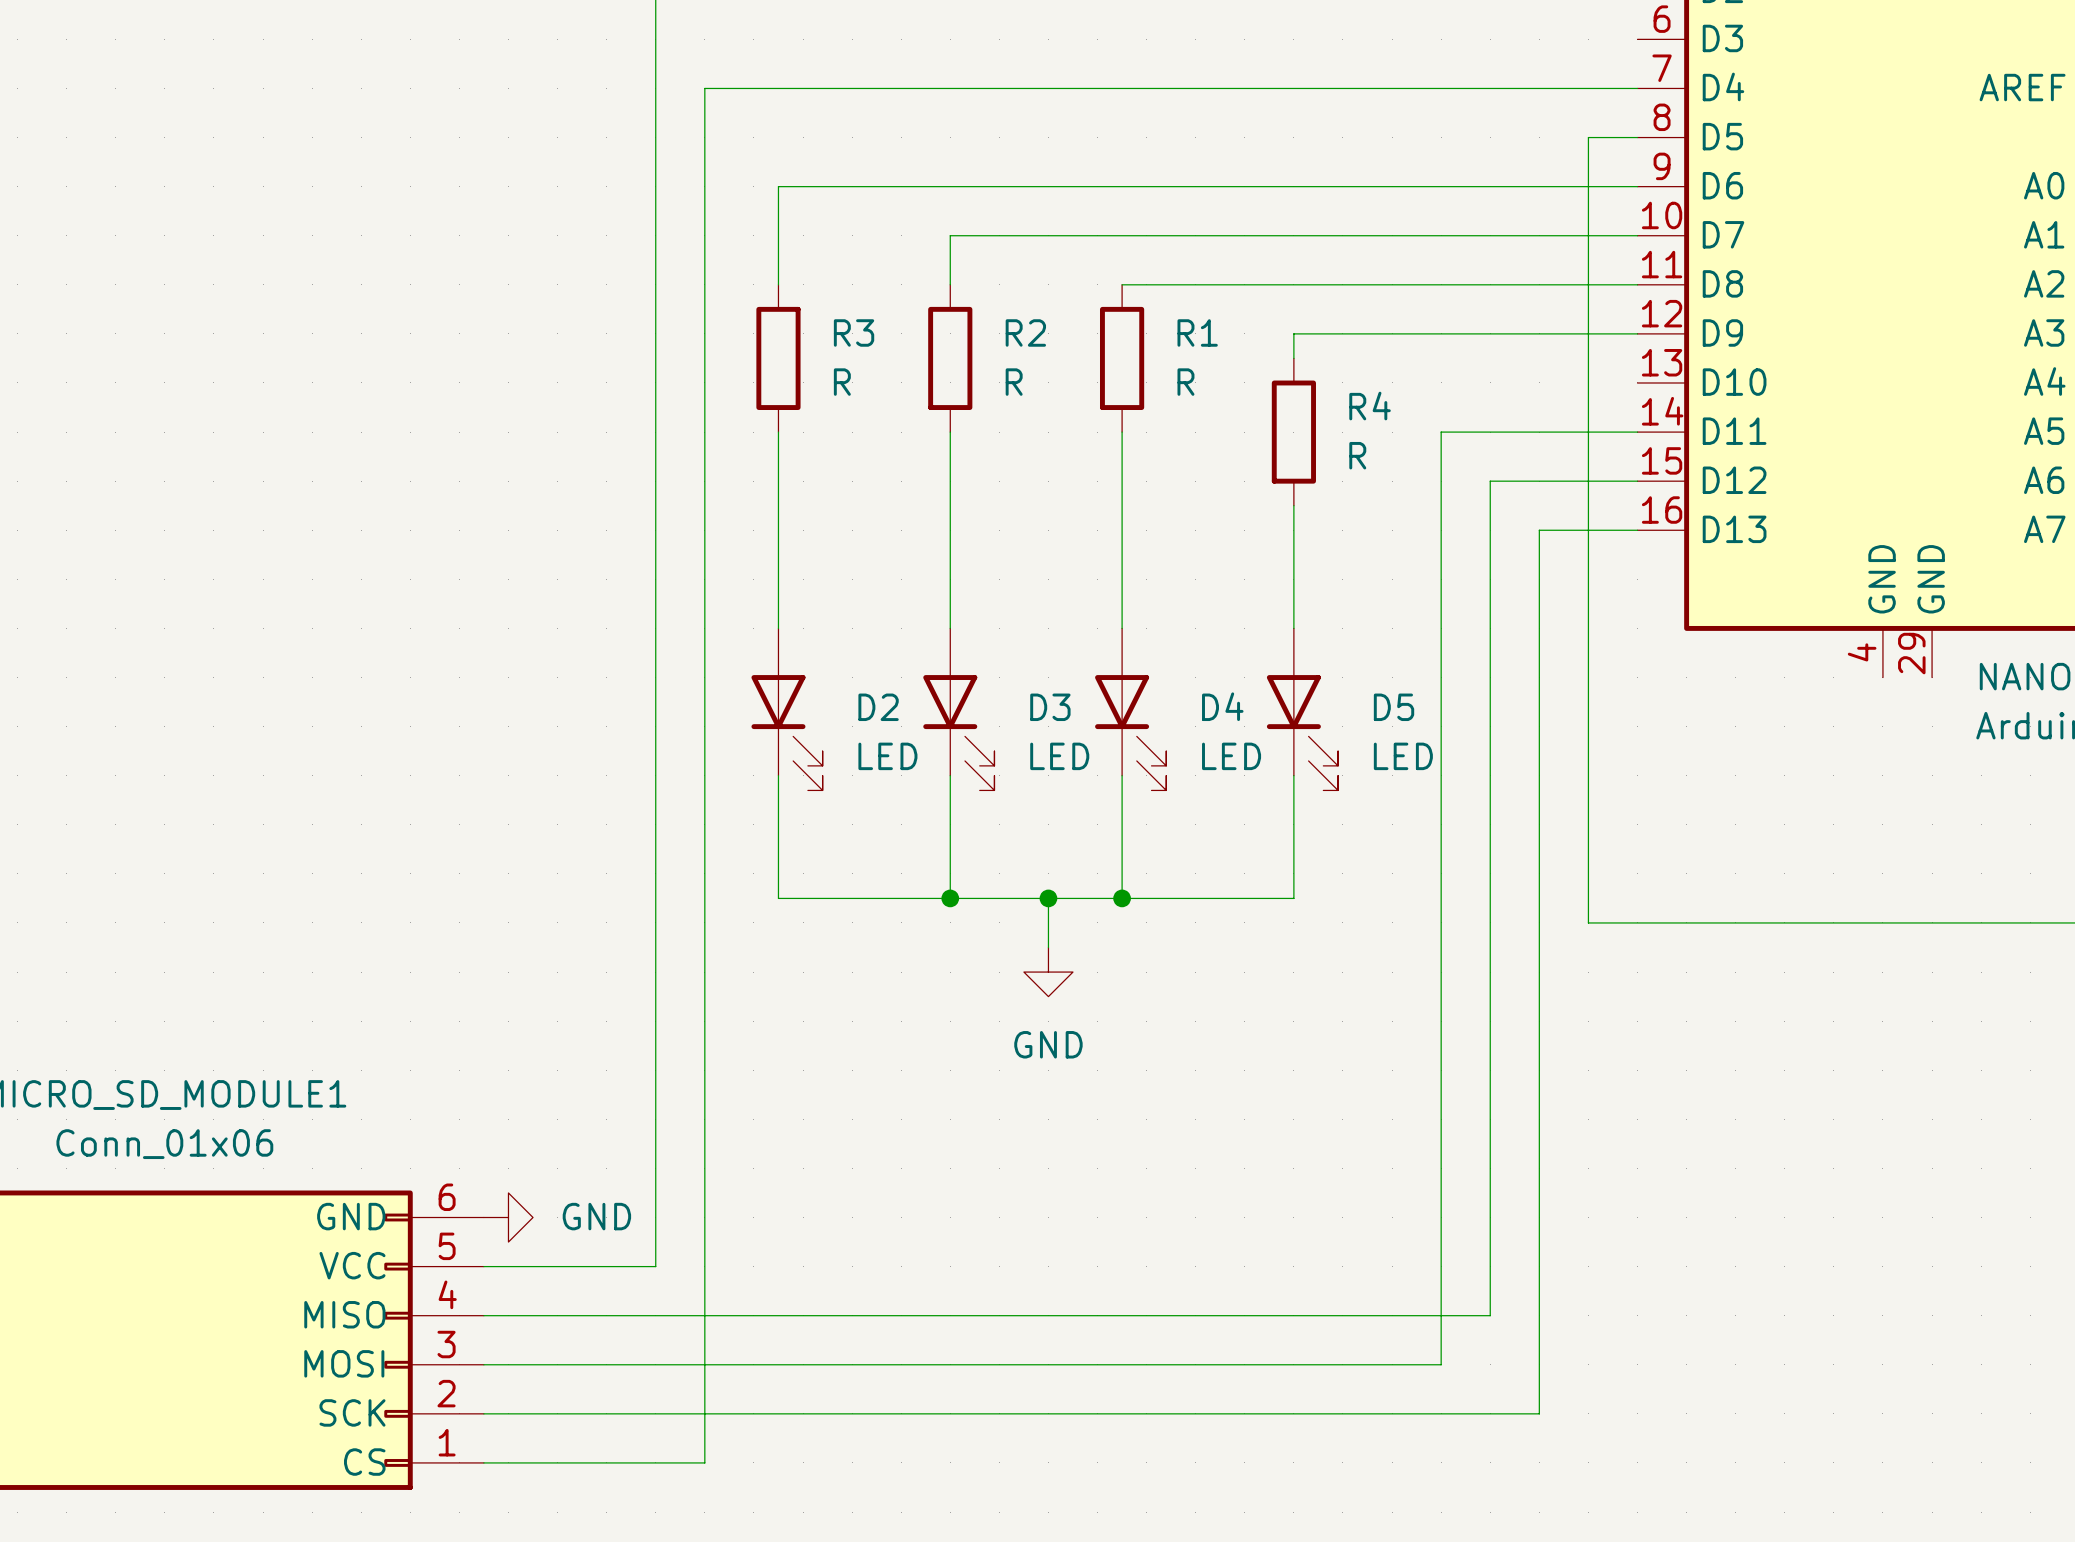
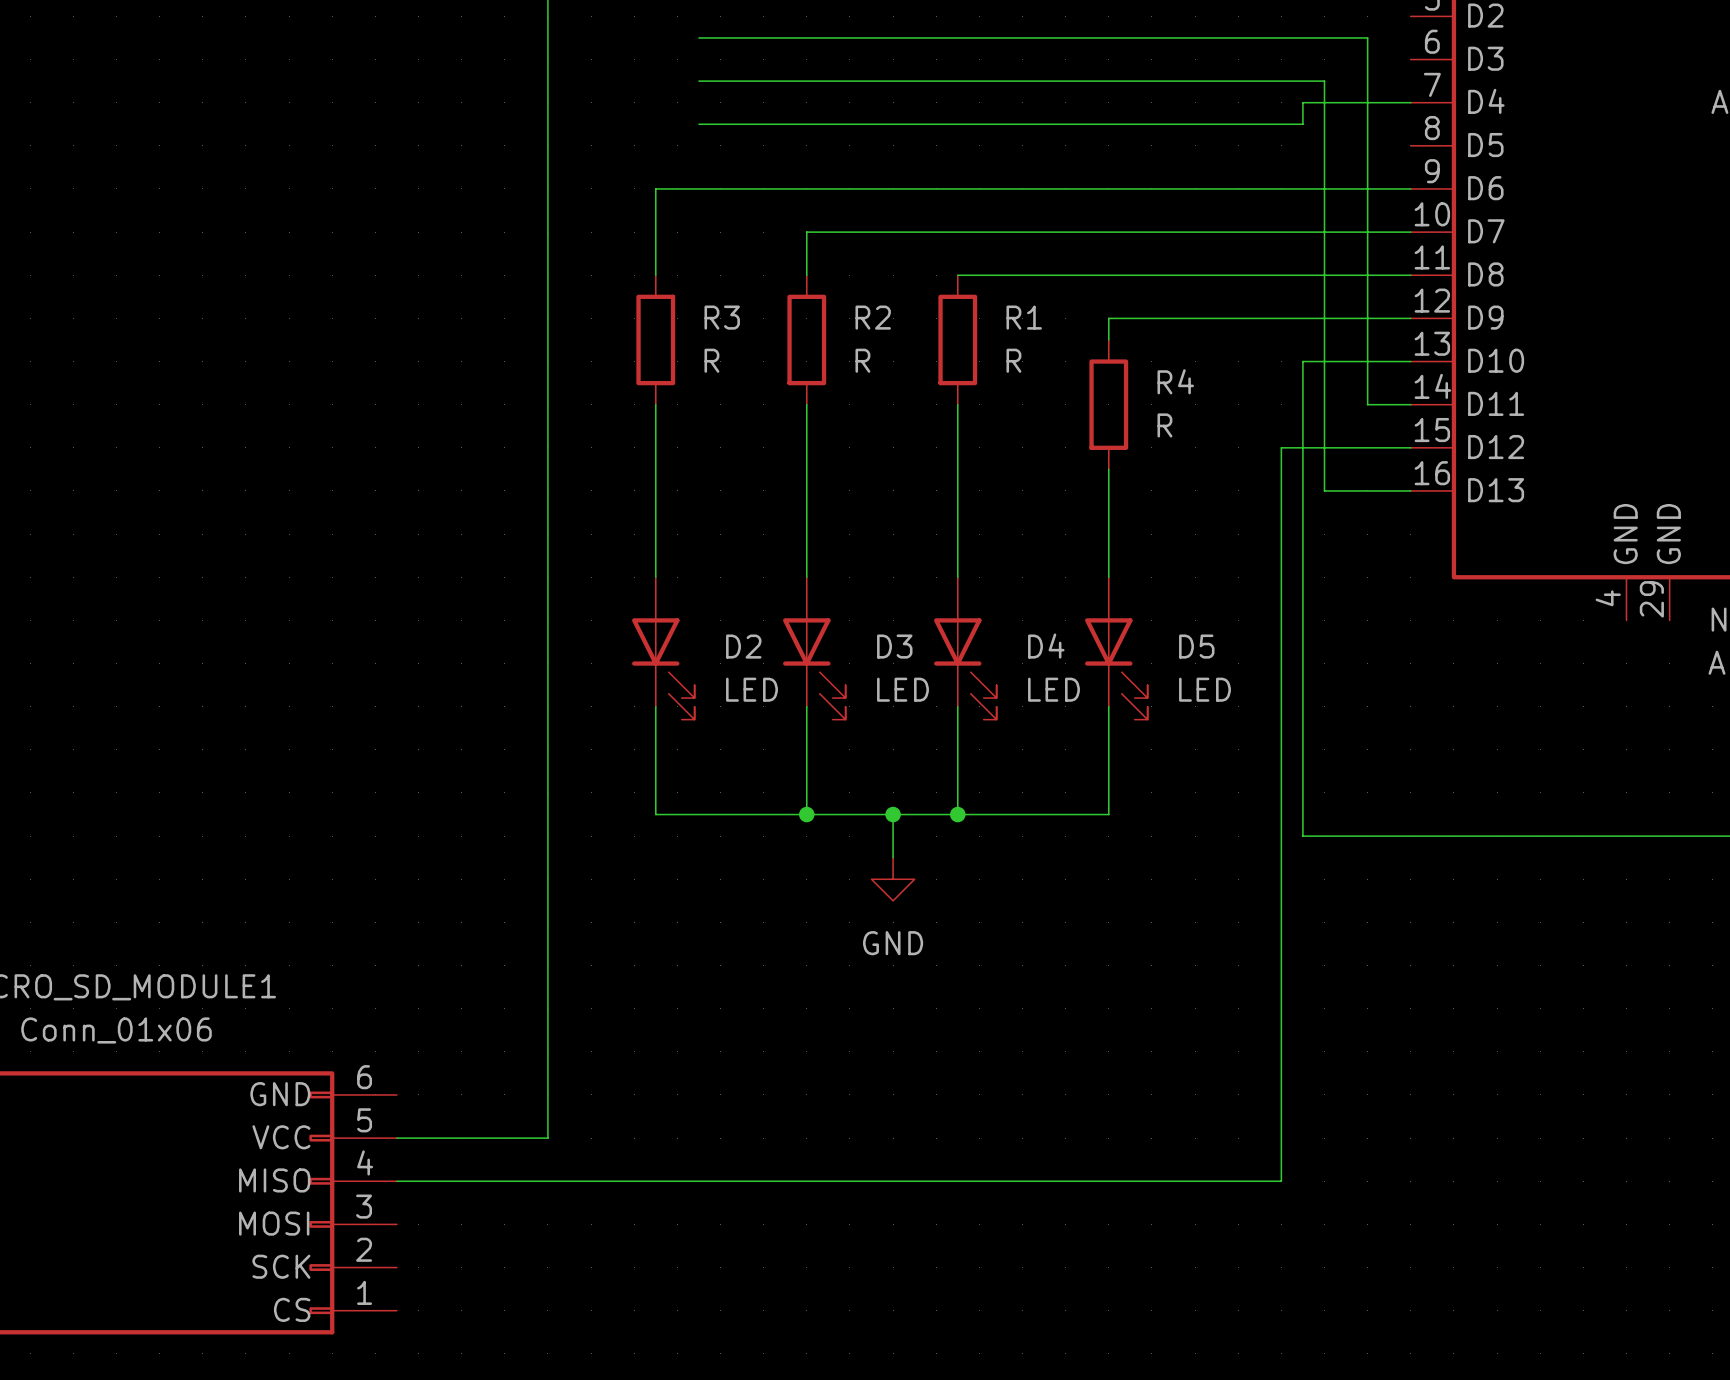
wire: (1514, 88) (704, 88) (704, 1462) (483, 1462) -> (1302, 102) (1302, 124) (698, 124)
wire: (1588, 137) (1637, 137) -> (1367, 145) (1367, 37) (698, 37)
wire: (1539, 530) (1539, 1413) (483, 1413) -> (1324, 490) (1324, 81) (698, 81)
wire: (1588, 922) (1588, 432) (1441, 432) (1441, 1364) (483, 1364) -> (1367, 836) (1302, 836) (1302, 361) (1410, 361)
power symbol: GND (508, 1217) -> none

